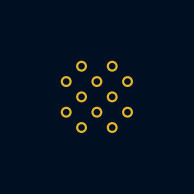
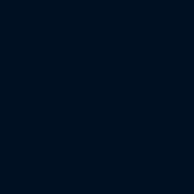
part: (96, 96) -> none

